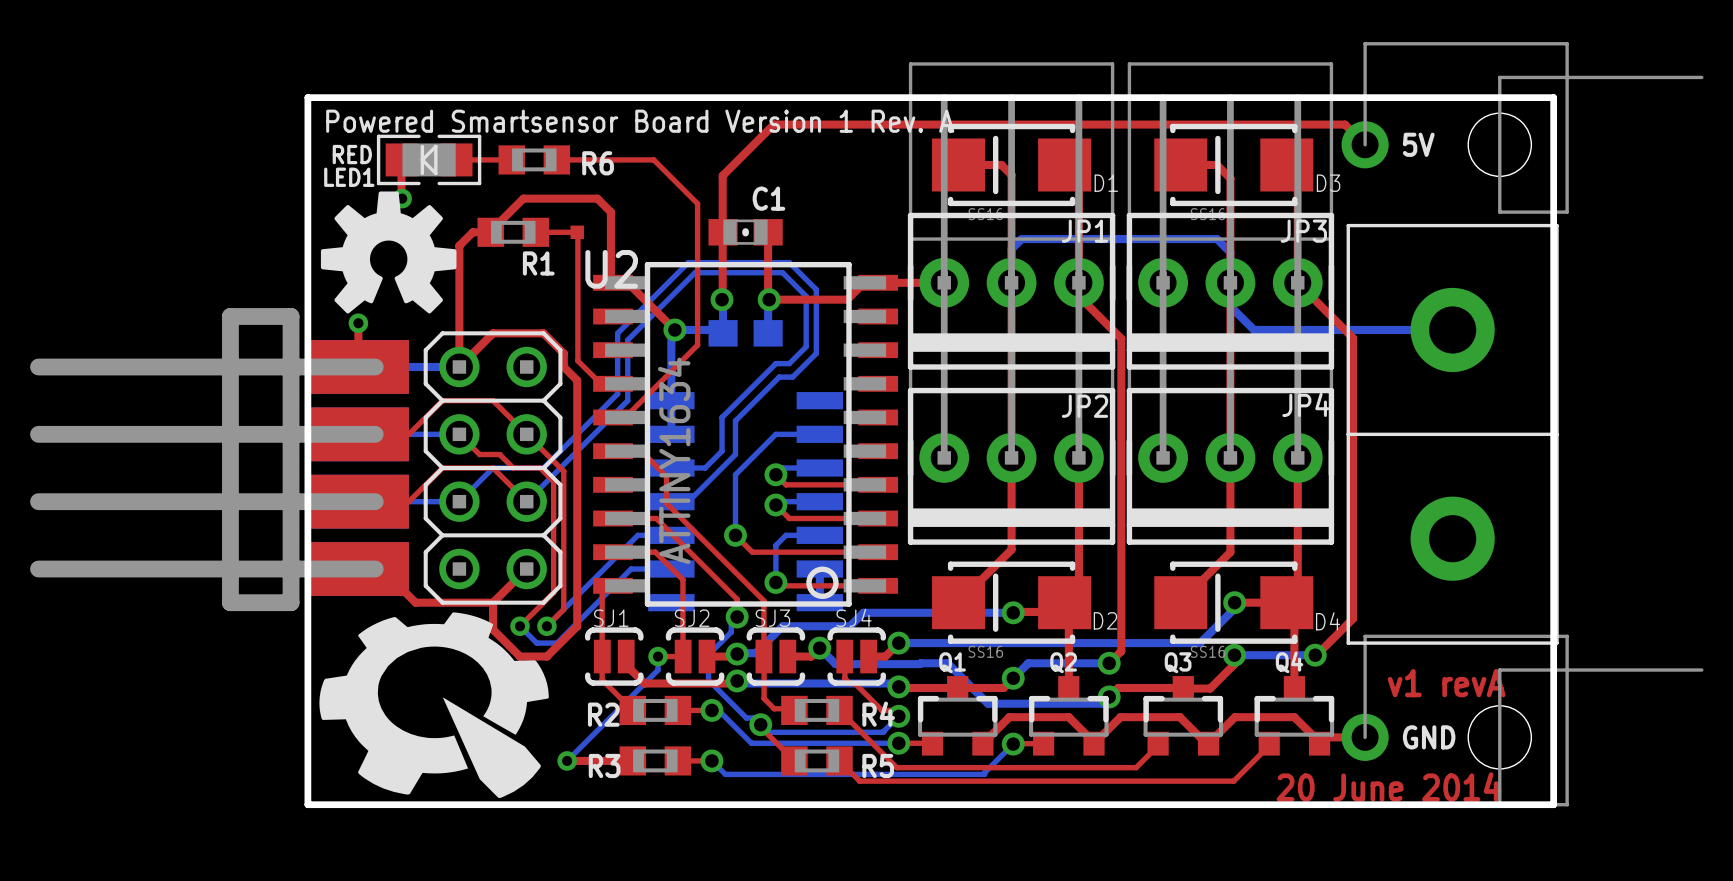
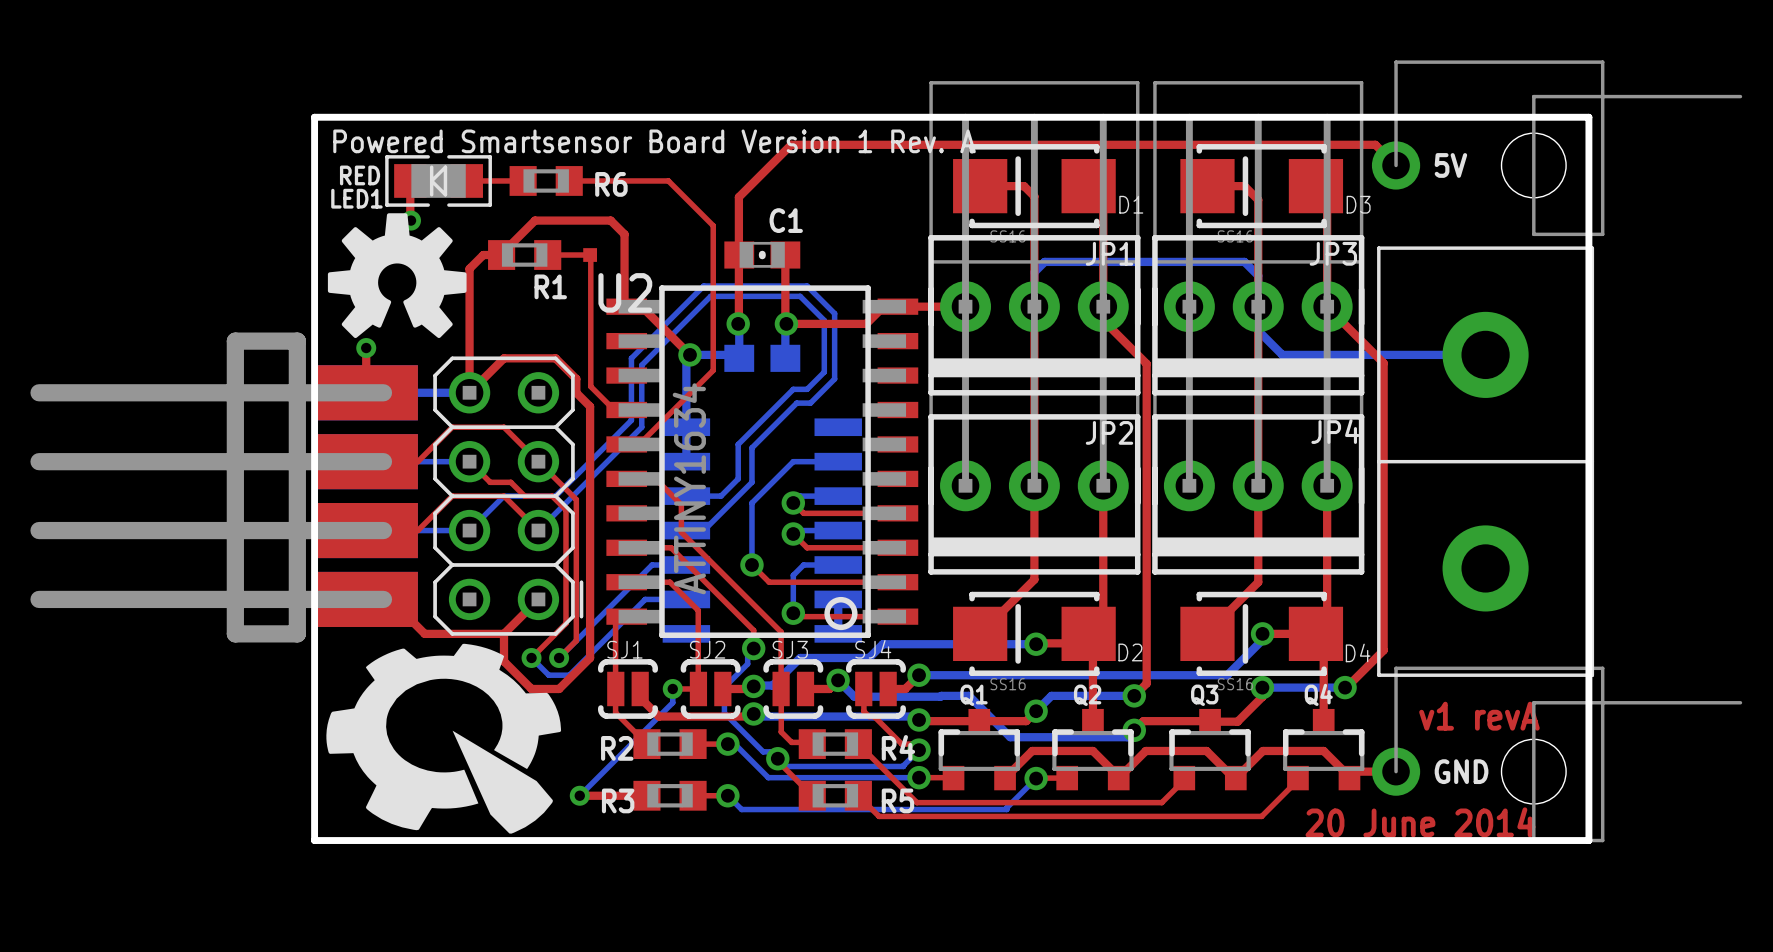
part footprint: [423, 331, 563, 605] -> [433, 356, 584, 636]

